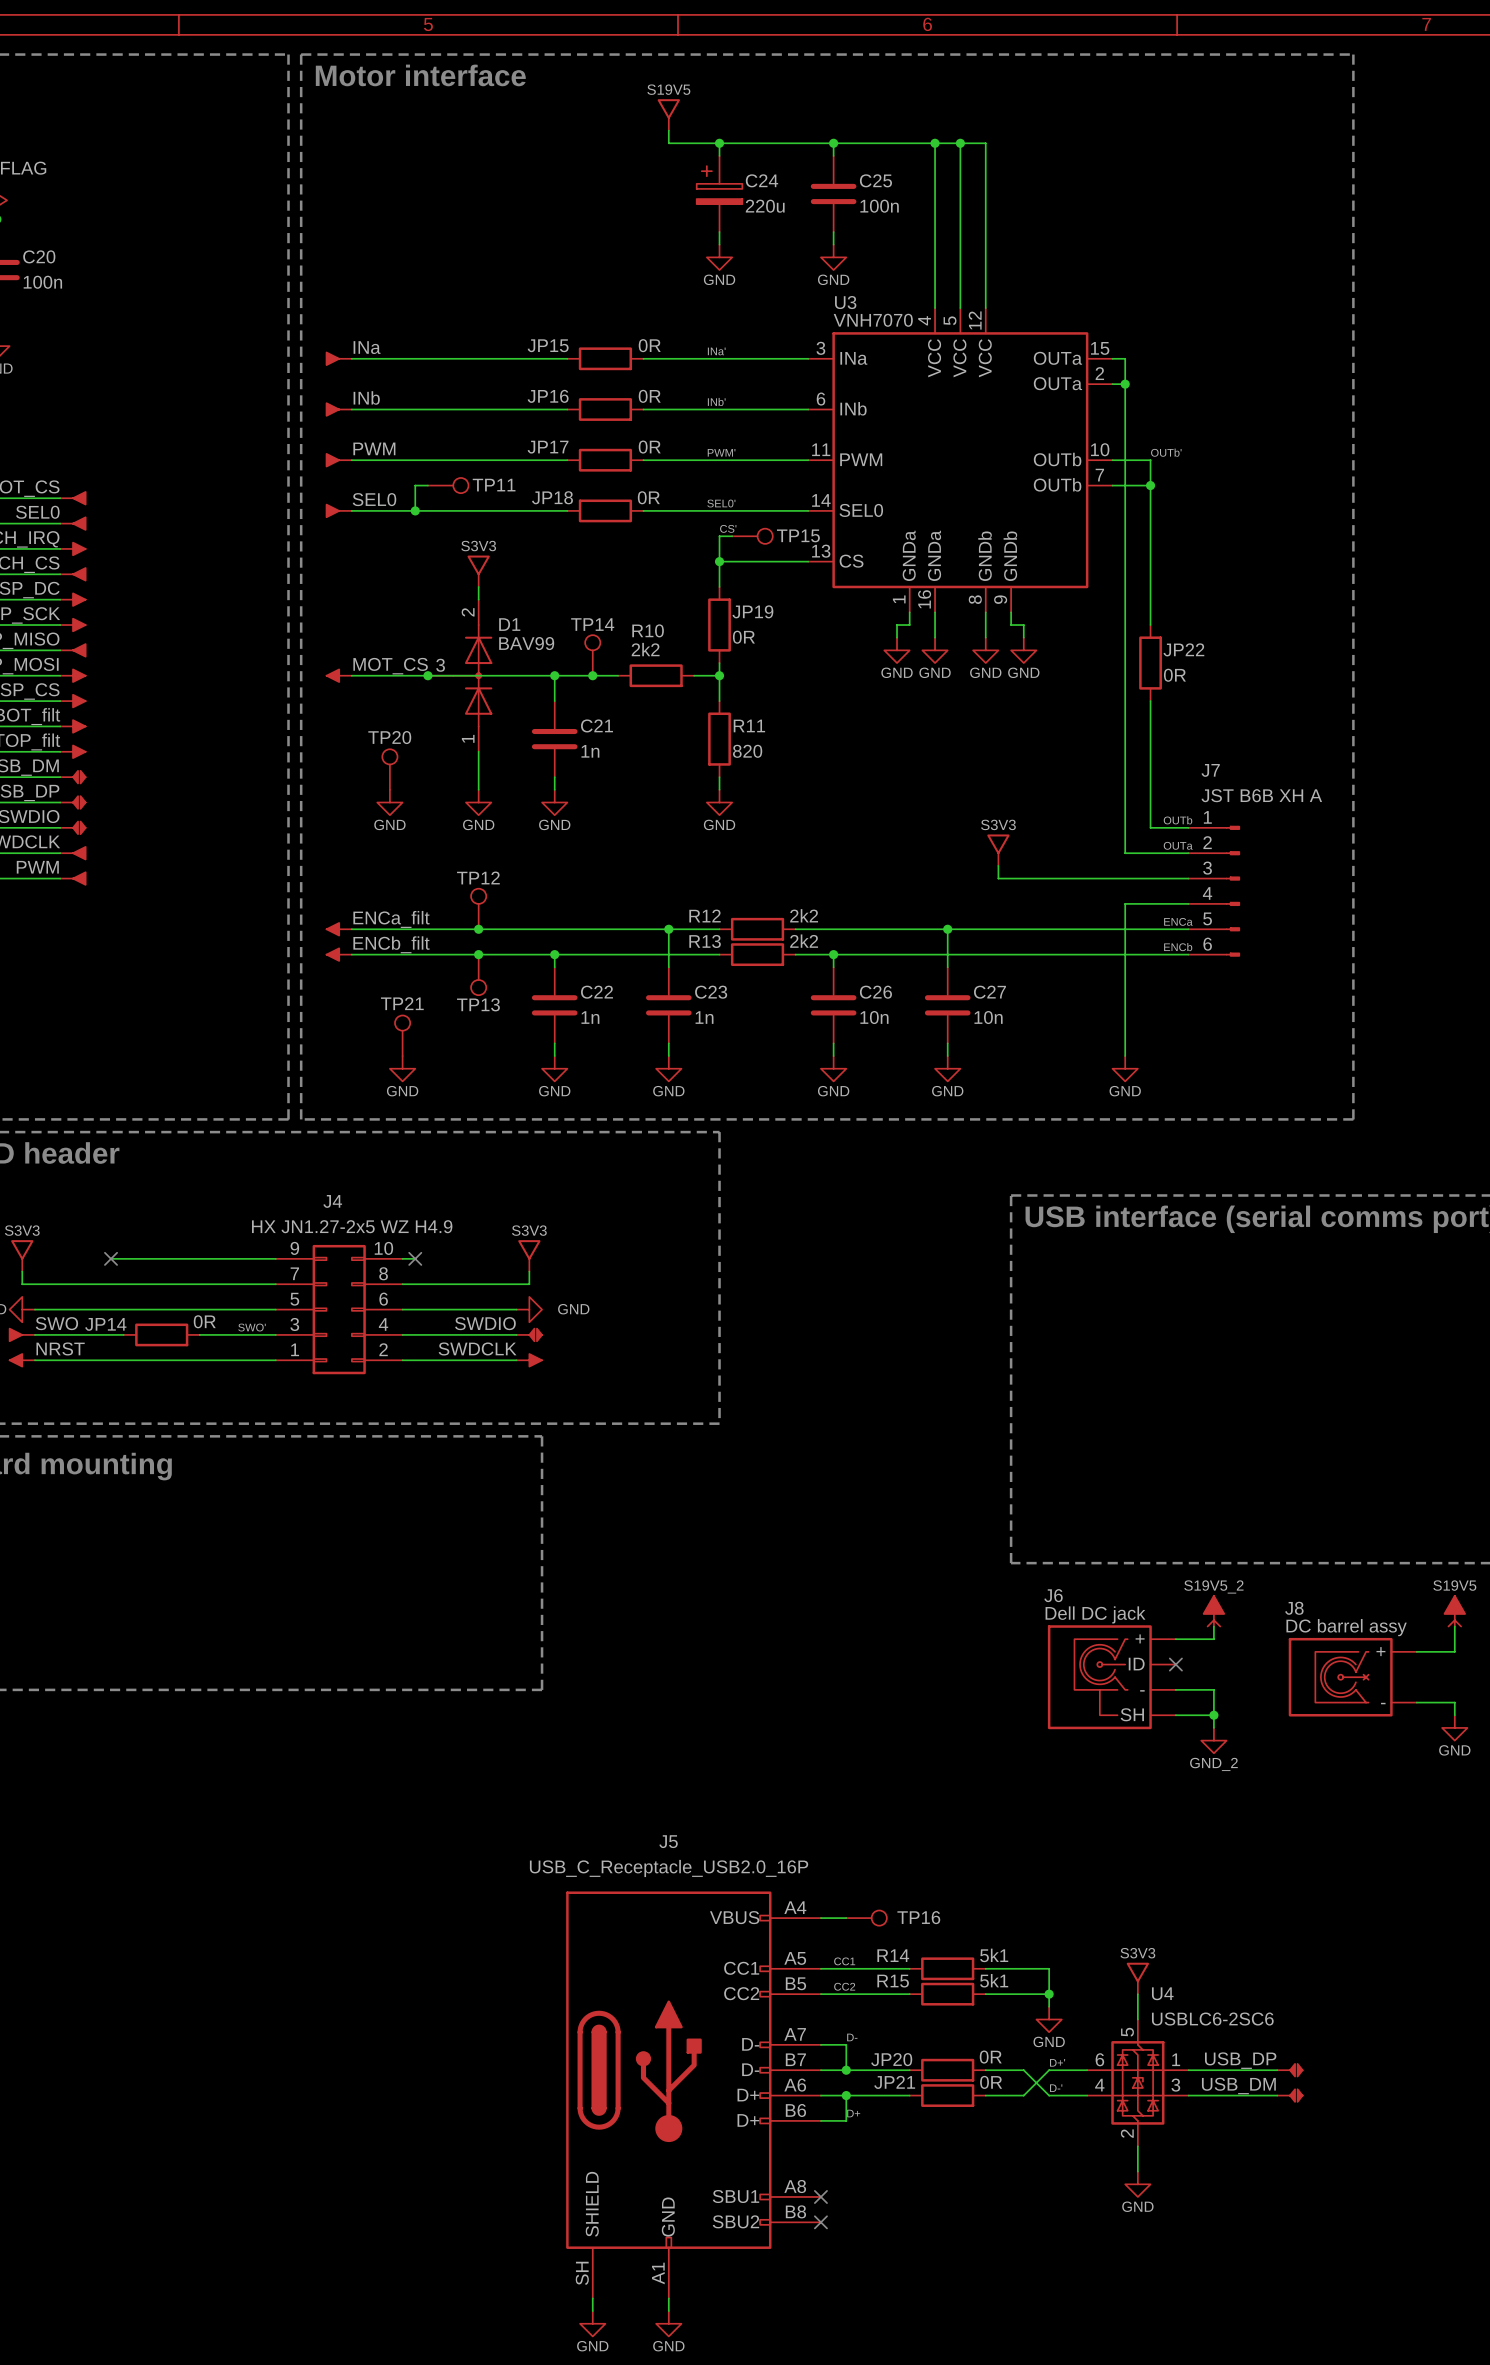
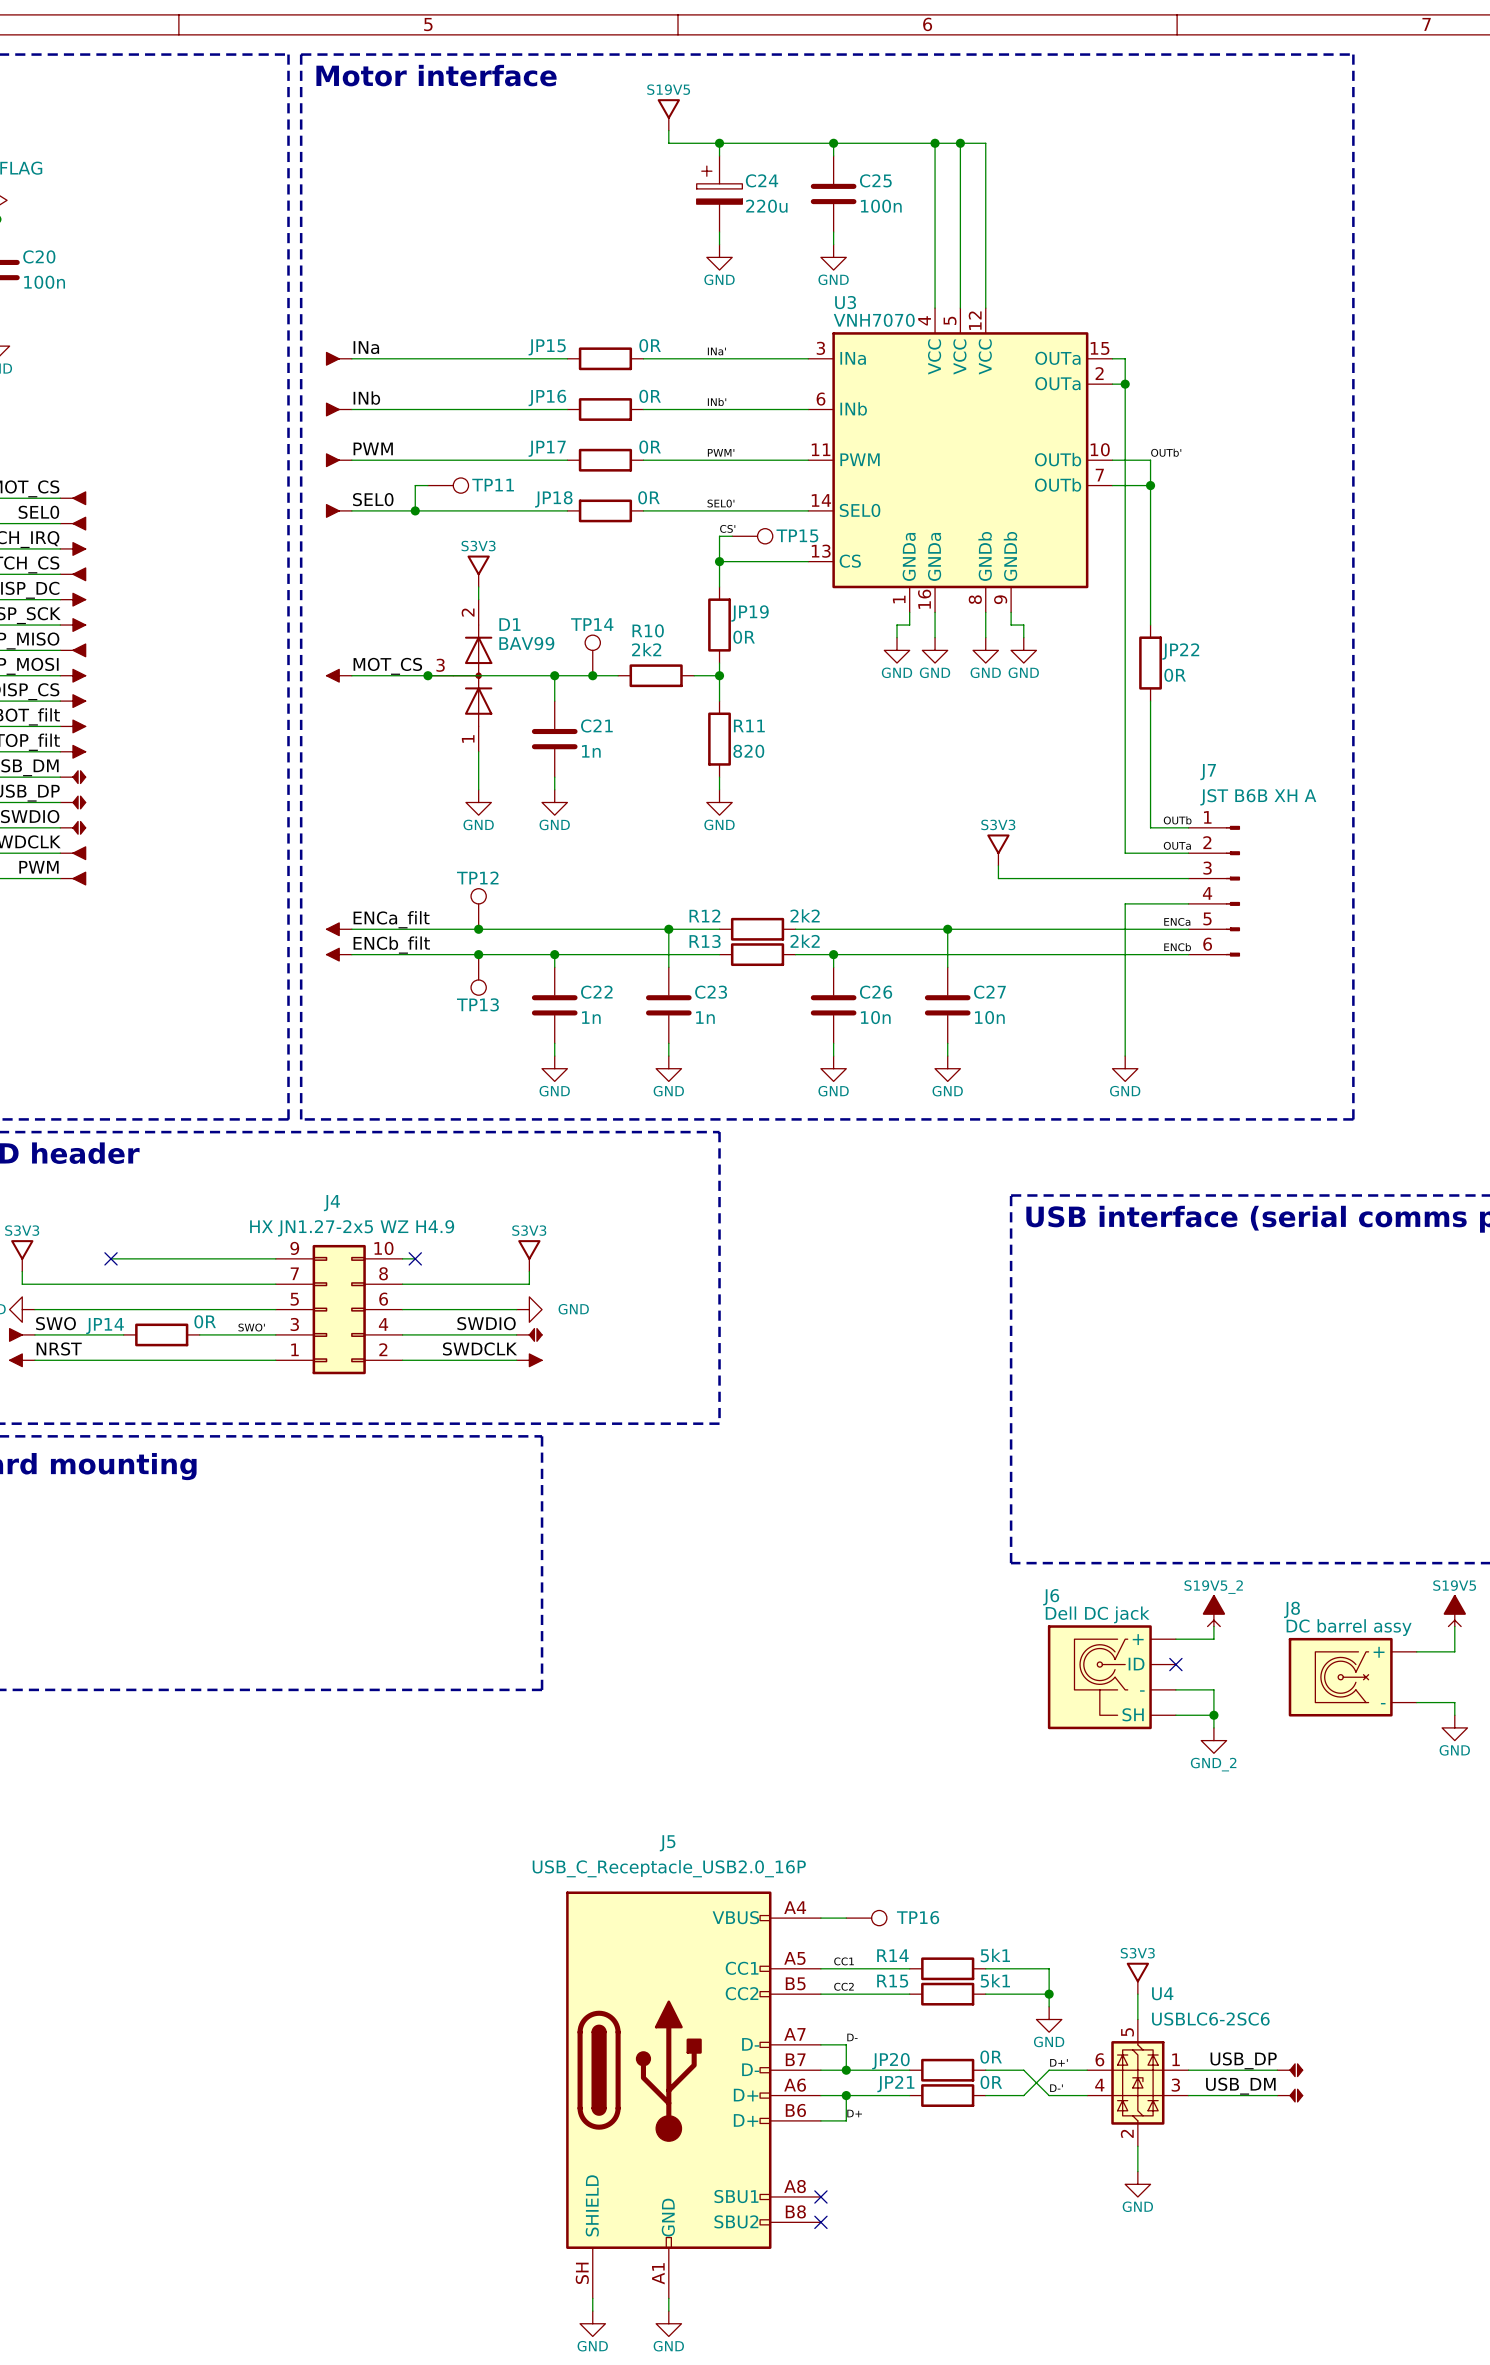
TP20: (389, 769) -> none
power symbol: GND (389, 802) -> none
TP21: (402, 1035) -> none
power symbol: GND (402, 1068) -> none

